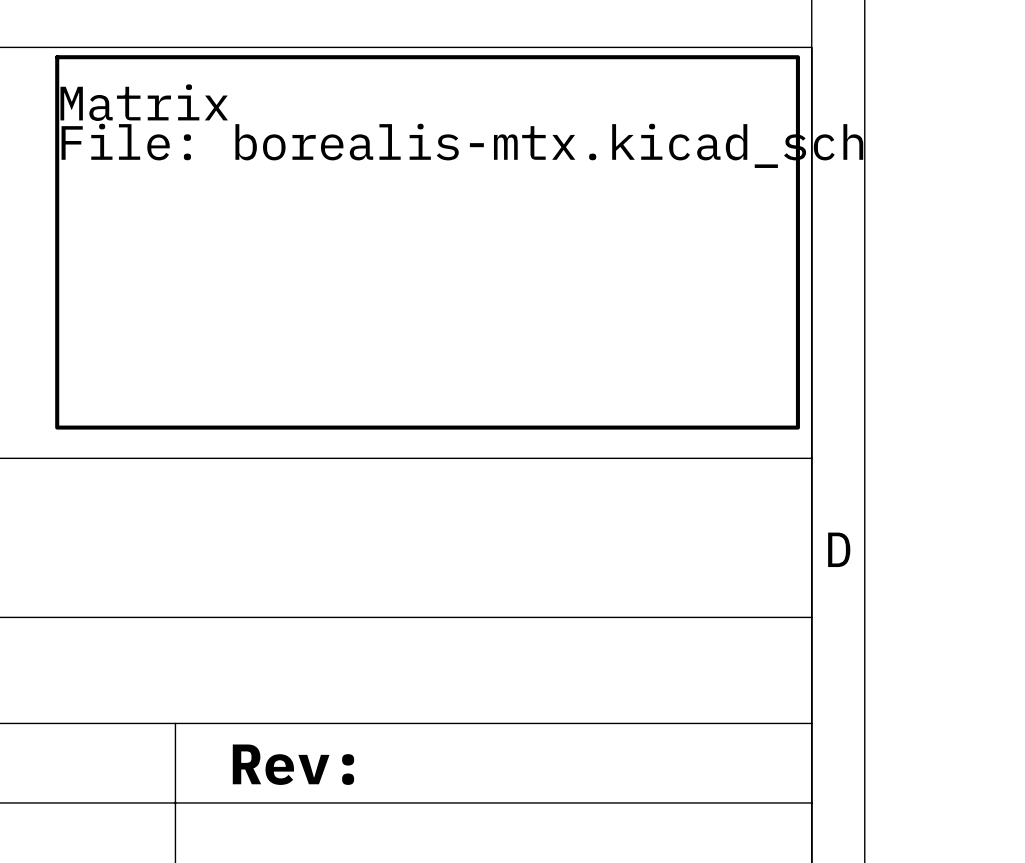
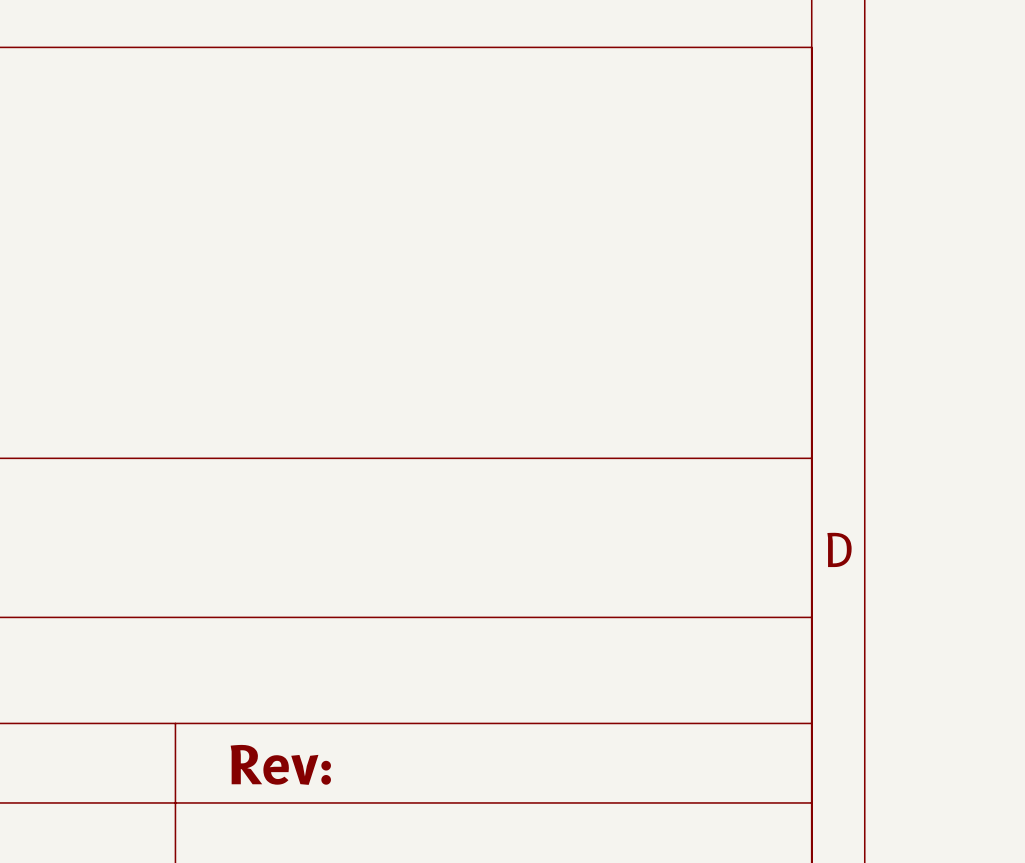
sheet Matrix: File: borealis-mtx.kicad_sch (427, 242) -> none

